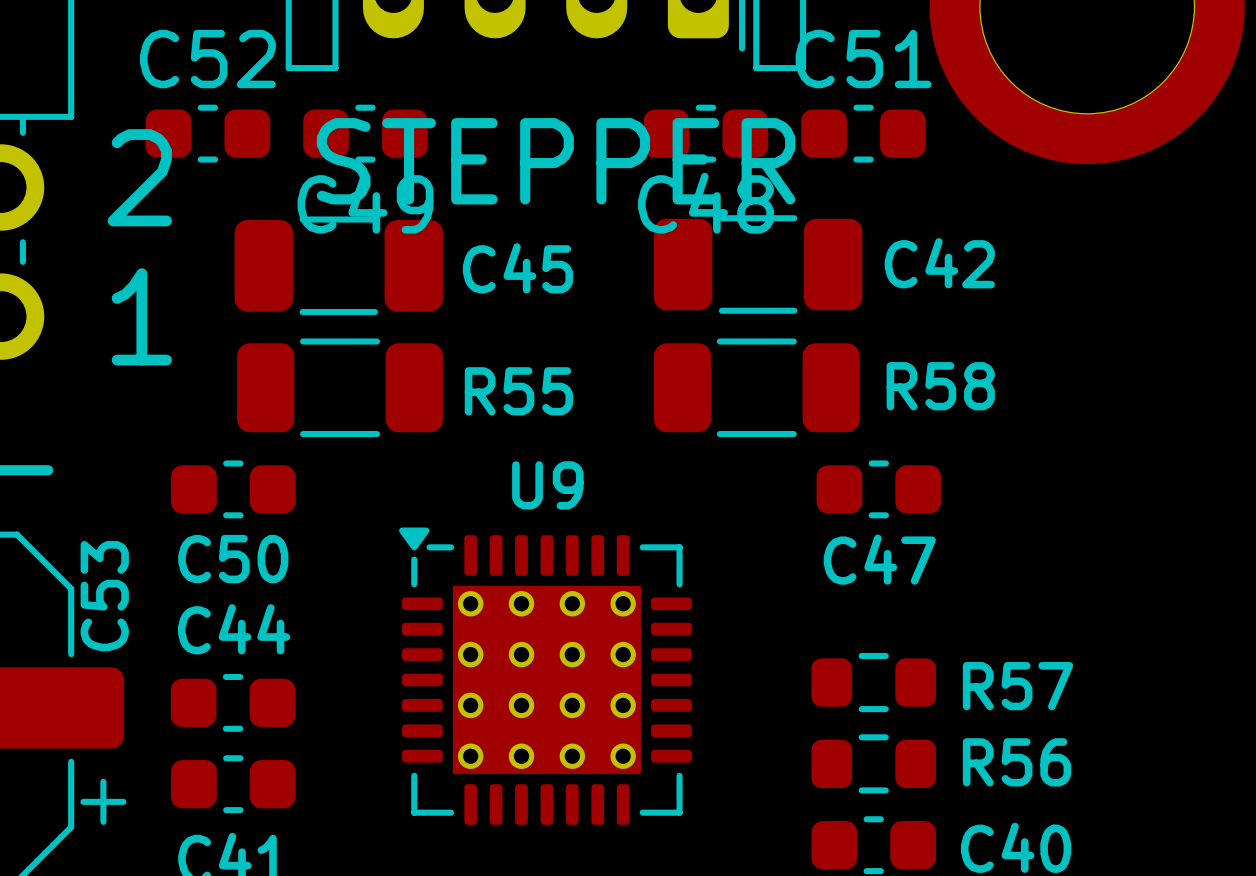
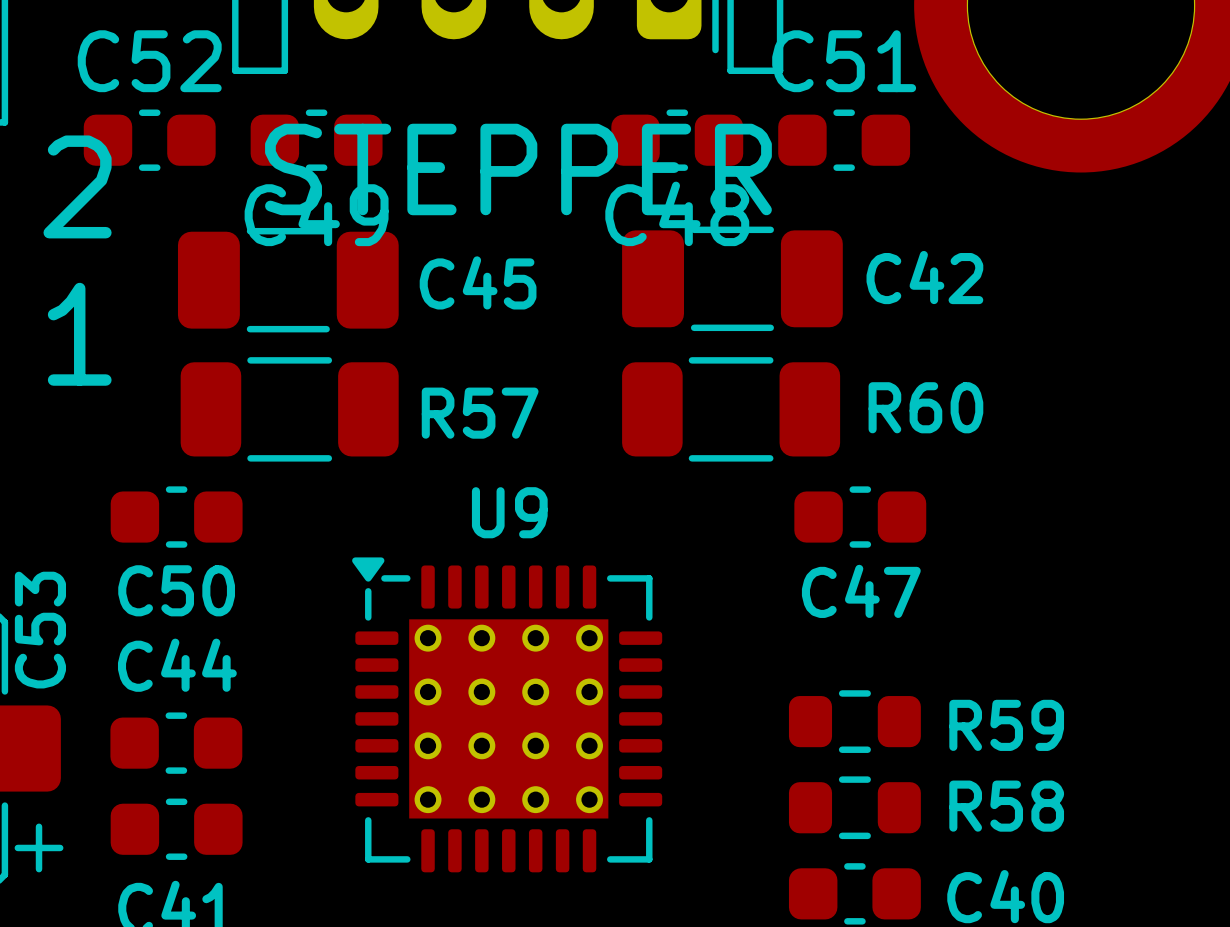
R58 name: R58 (940, 386) -> R60 (925, 407)
R55 name: R55 (518, 391) -> R57 (480, 413)
R57 name: R57 (1017, 686) -> R59 (1006, 725)
R56 name: R56 (1017, 762) -> R58 (1006, 806)

